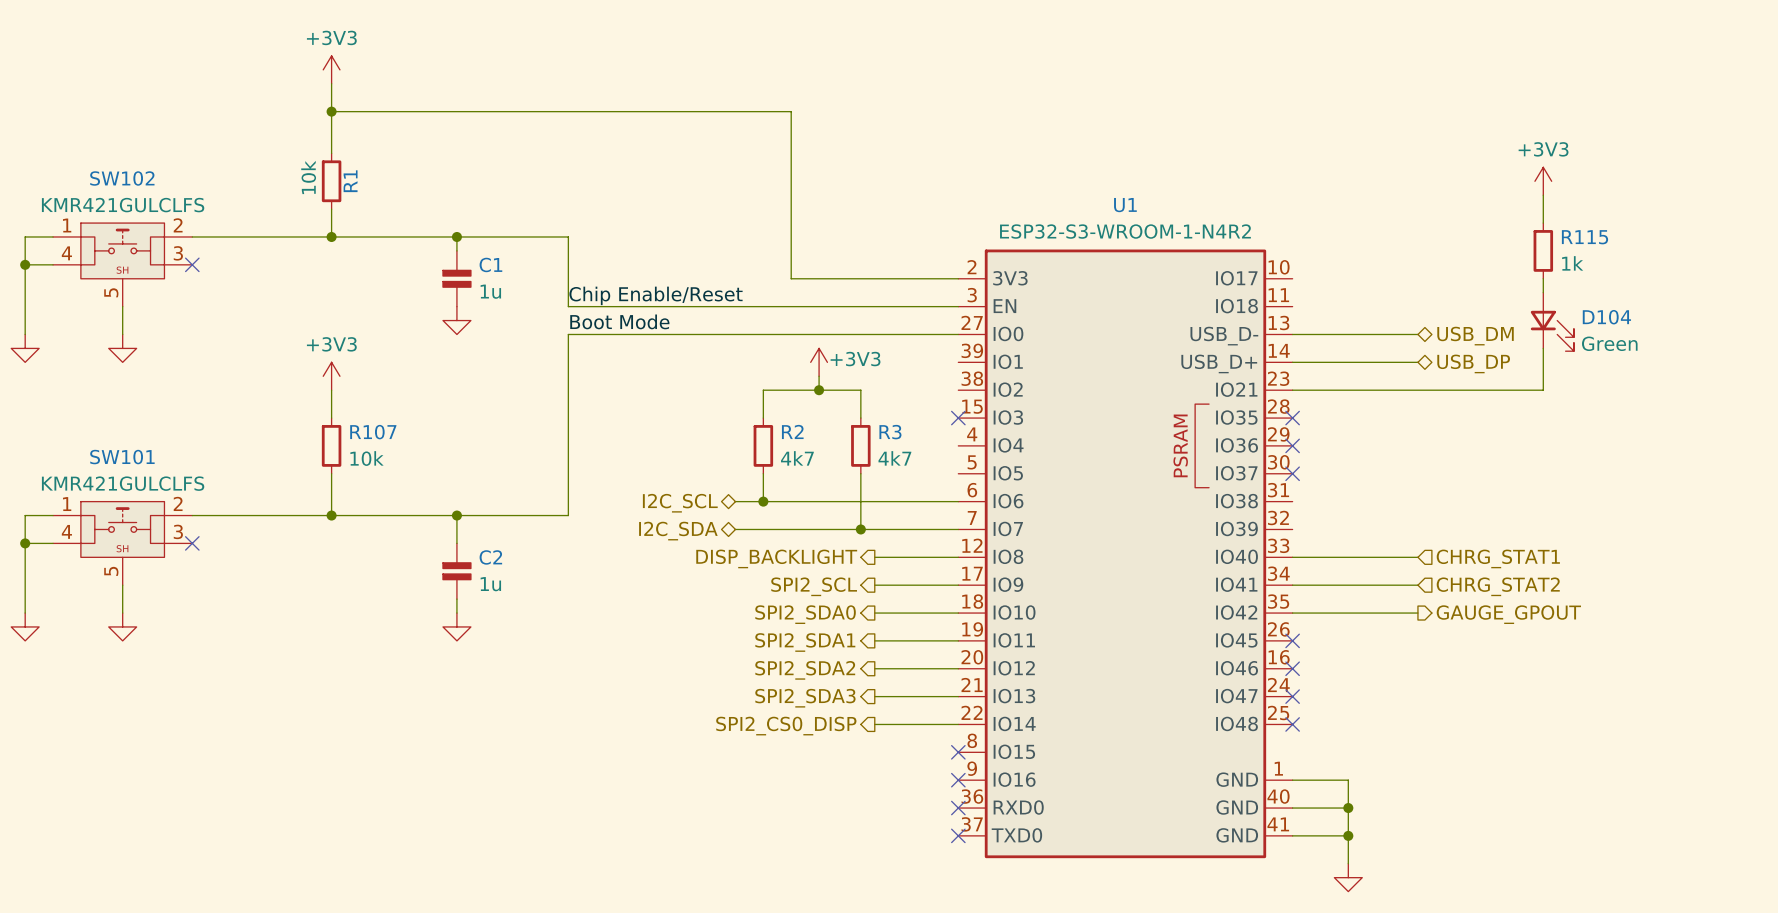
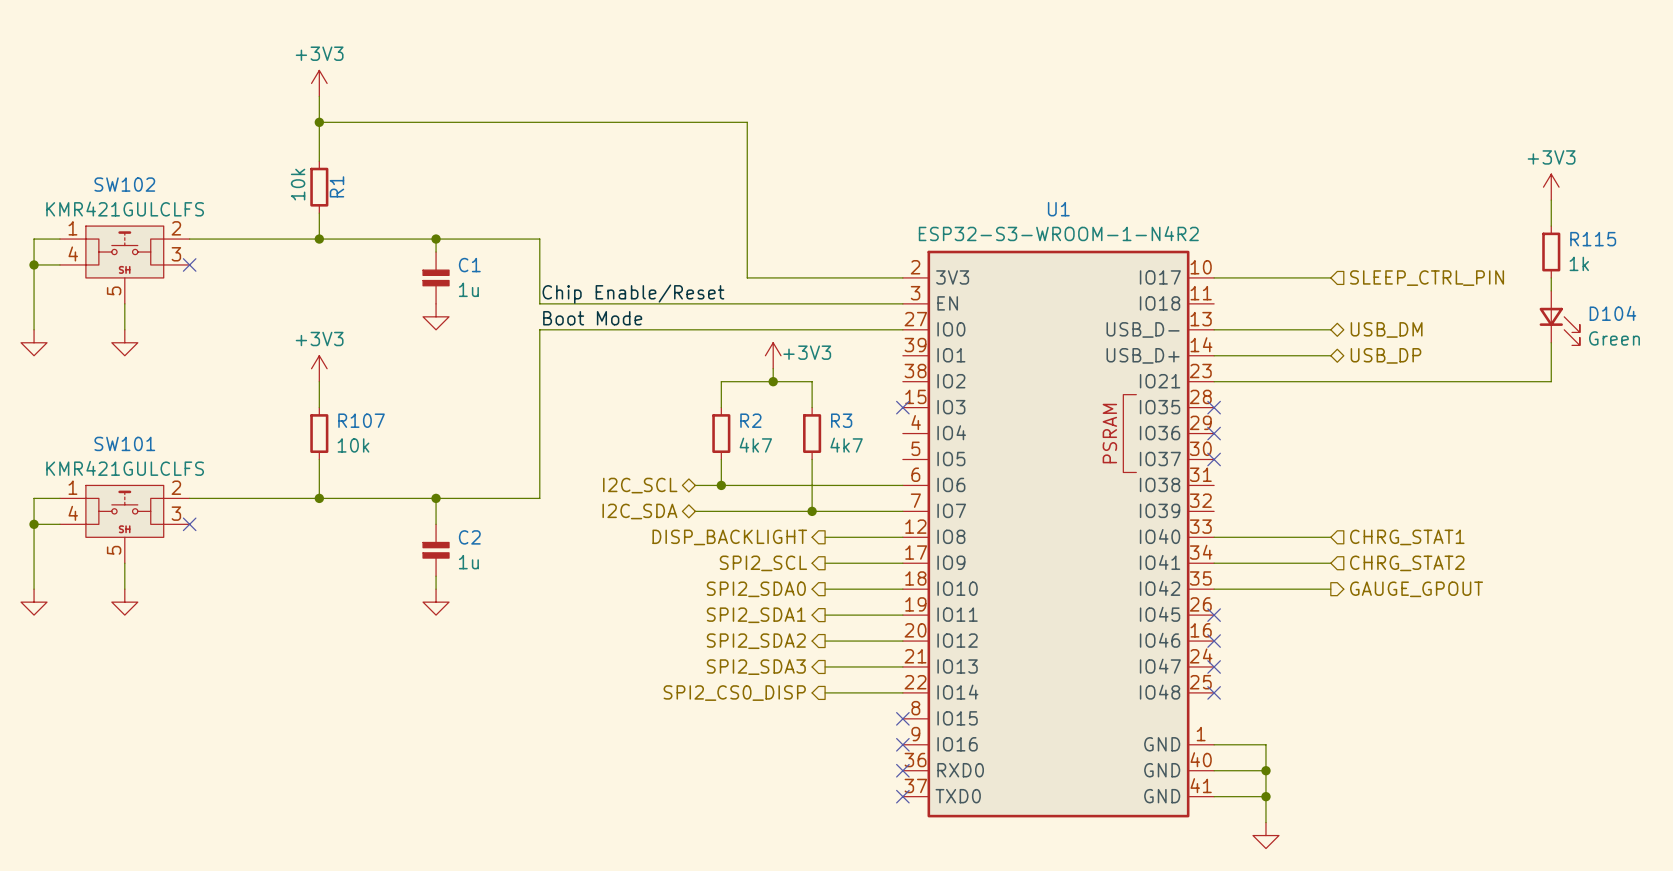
power symbol position: +3V3 (1543, 181) -> +3V3 (1551, 187)
wire: (1543, 195) (1543, 223) -> (1551, 200) (1551, 226)
R115 position: (1543, 250) -> (1551, 252)
wire: none -> (1214, 277) (1330, 277)
wire: (1543, 278) (1543, 292) -> (1551, 277) (1551, 290)
hierarchical label: none -> SLEEP_CTRL_PIN (1427, 278)
D104 position: (1552, 321) -> (1559, 318)
wire: (1543, 348) (1543, 390) -> (1551, 342) (1551, 381) (1447, 381)

